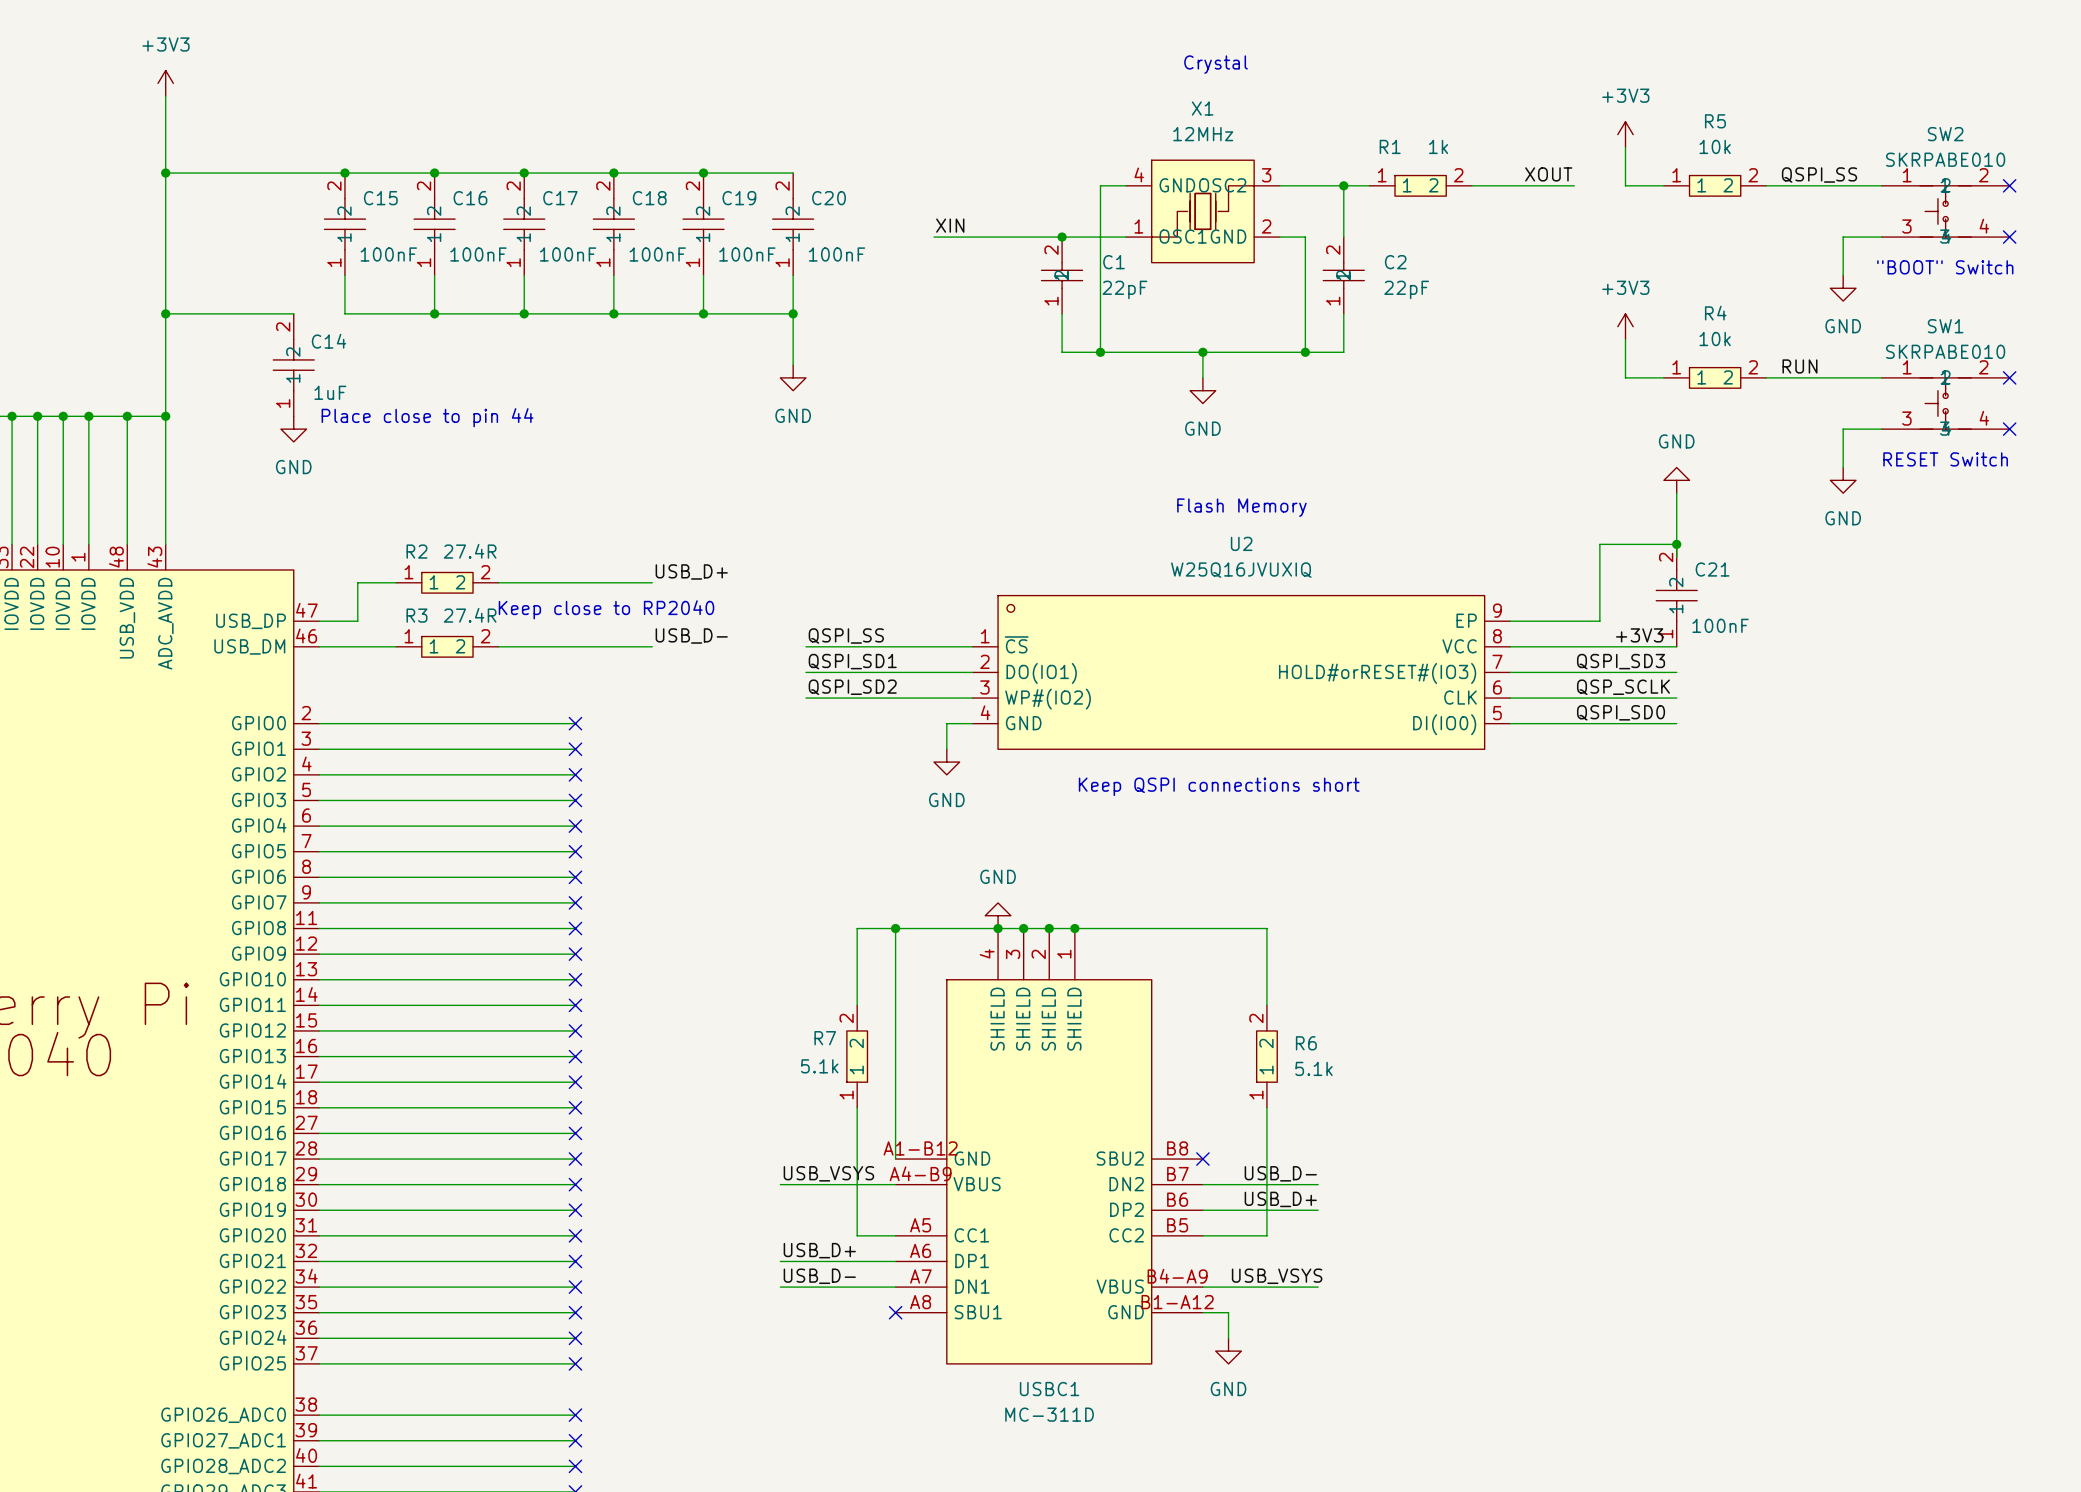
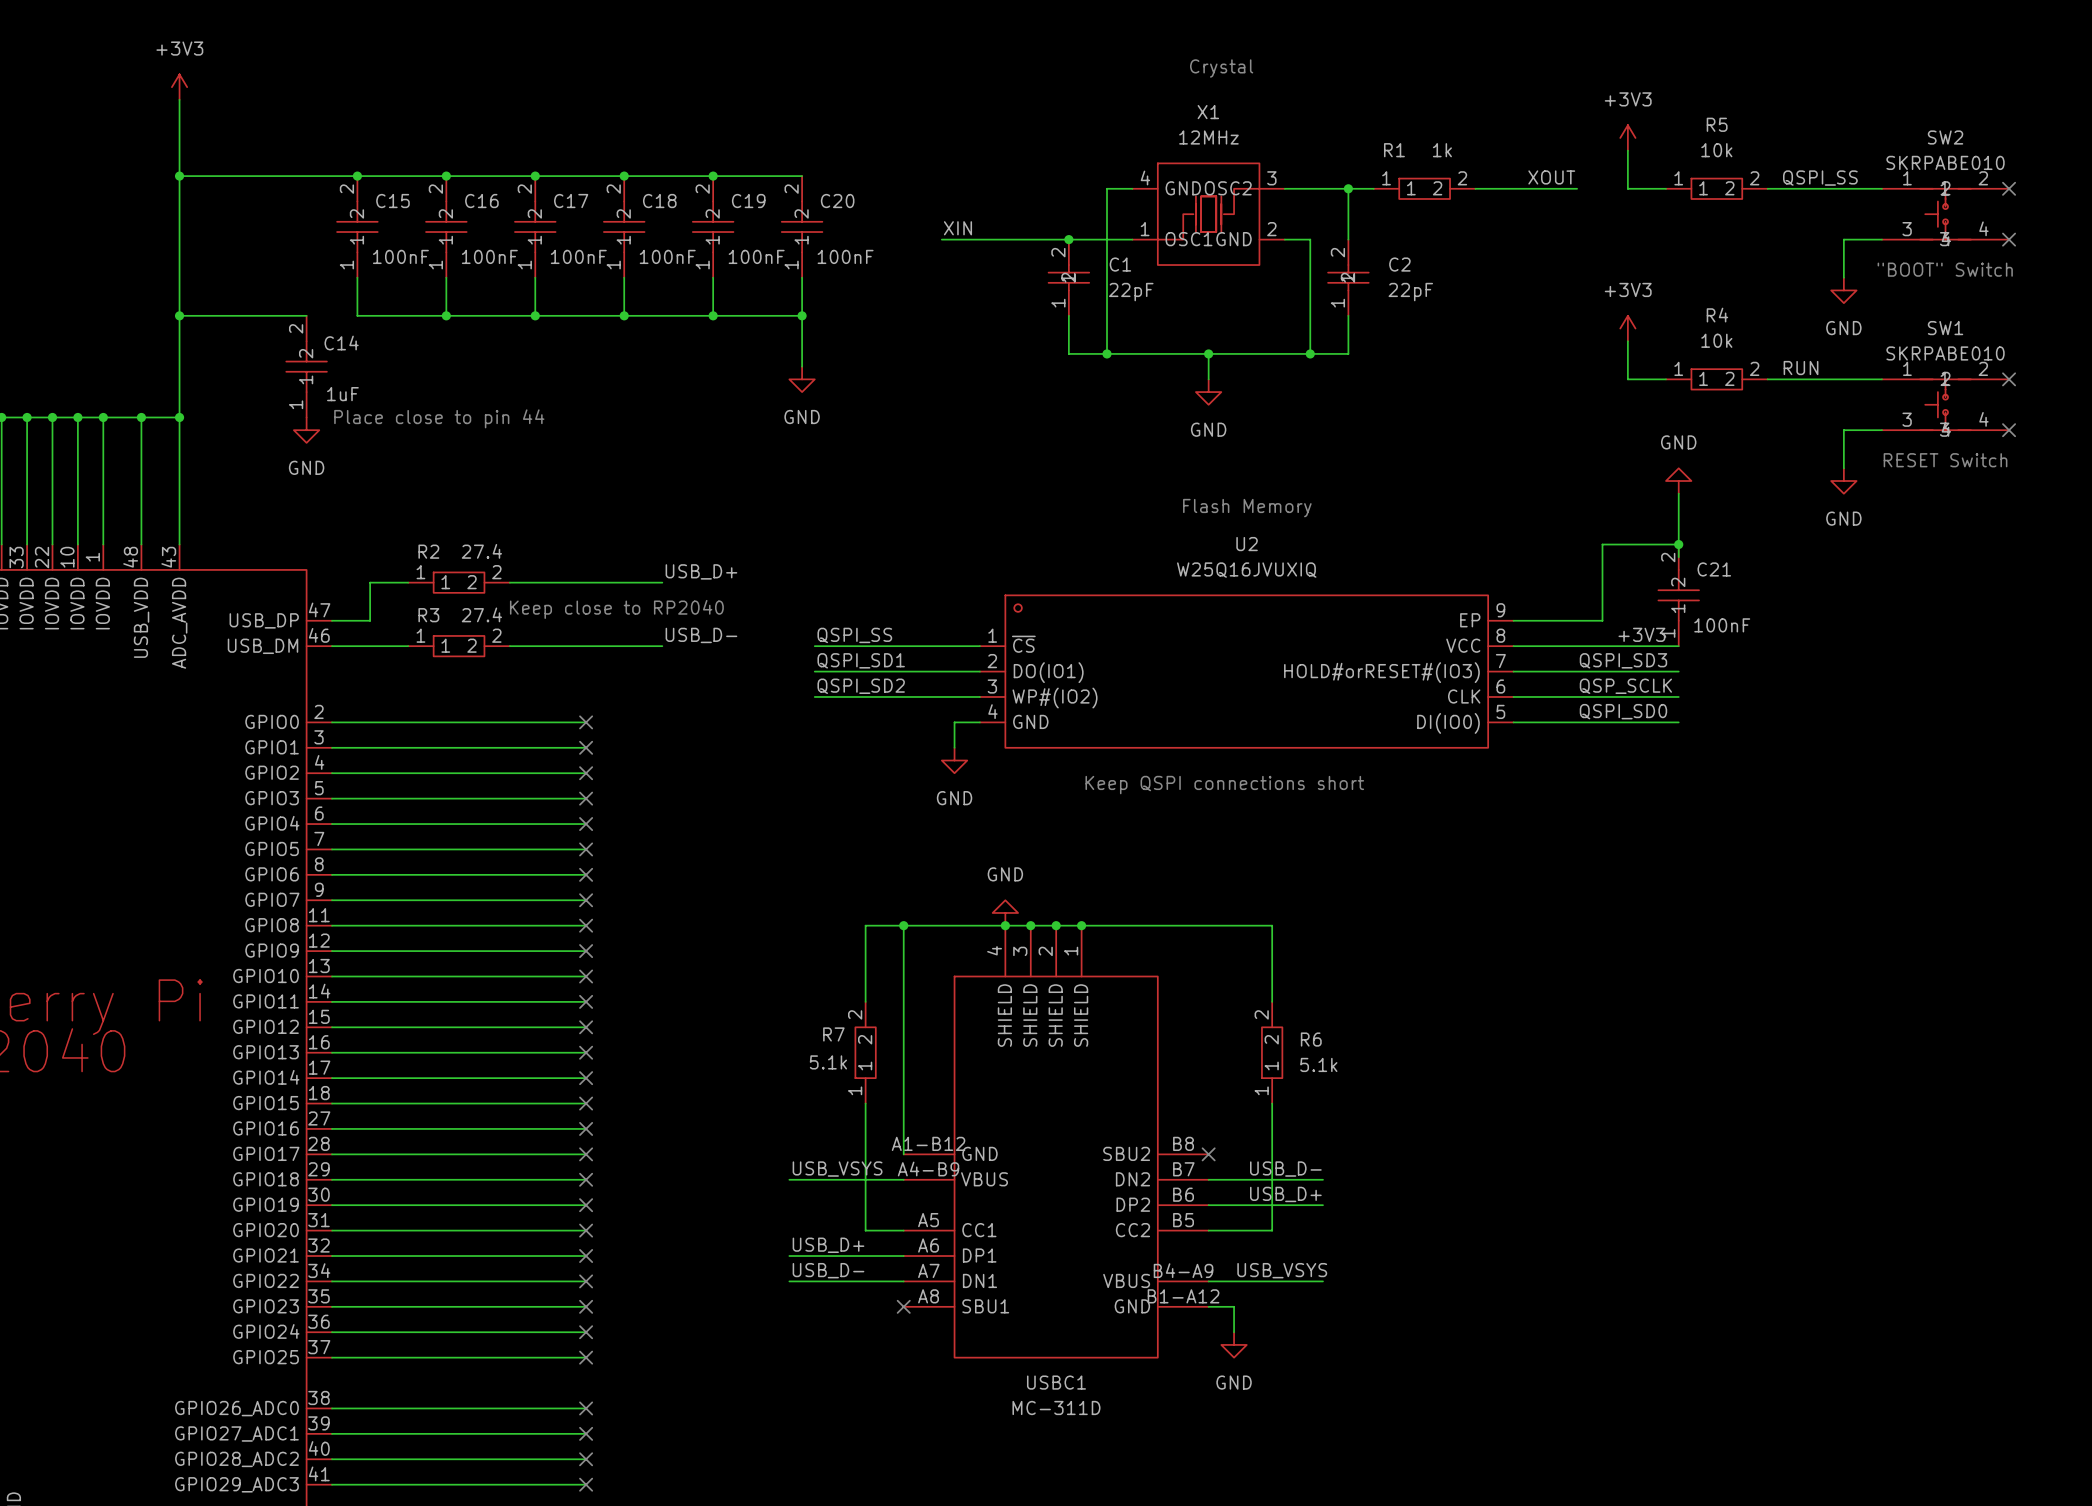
R2 value: 27.4R (470, 551) -> 27.4 (481, 551)
R3 value: 27.4R (470, 615) -> 27.4 (481, 614)

